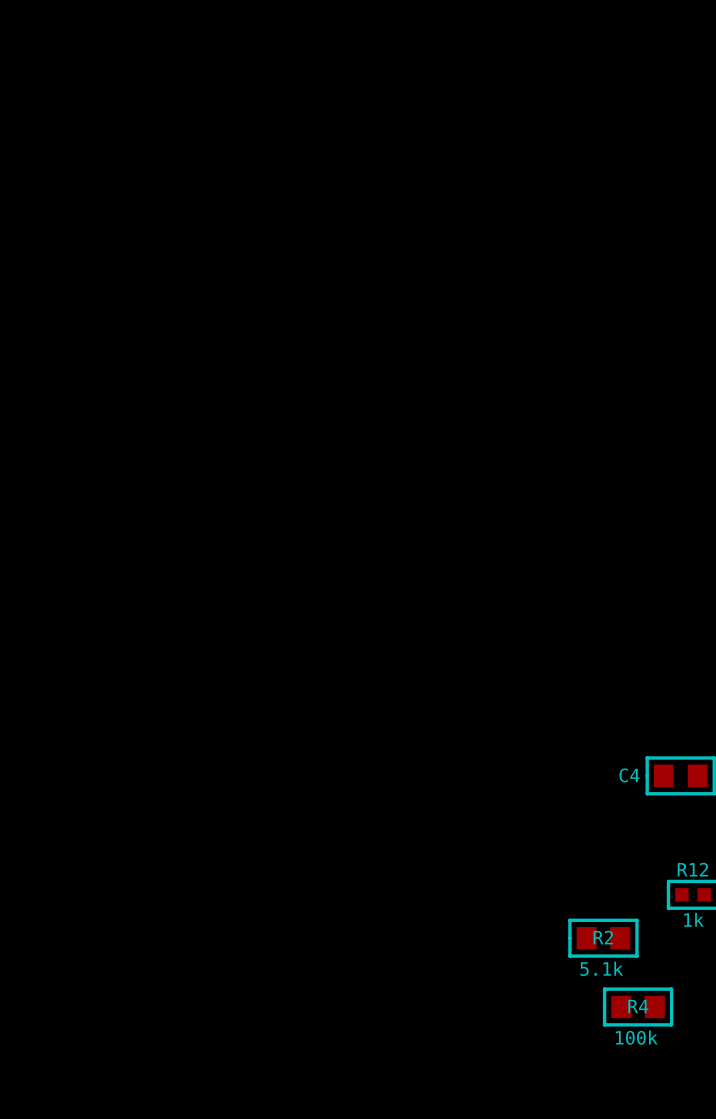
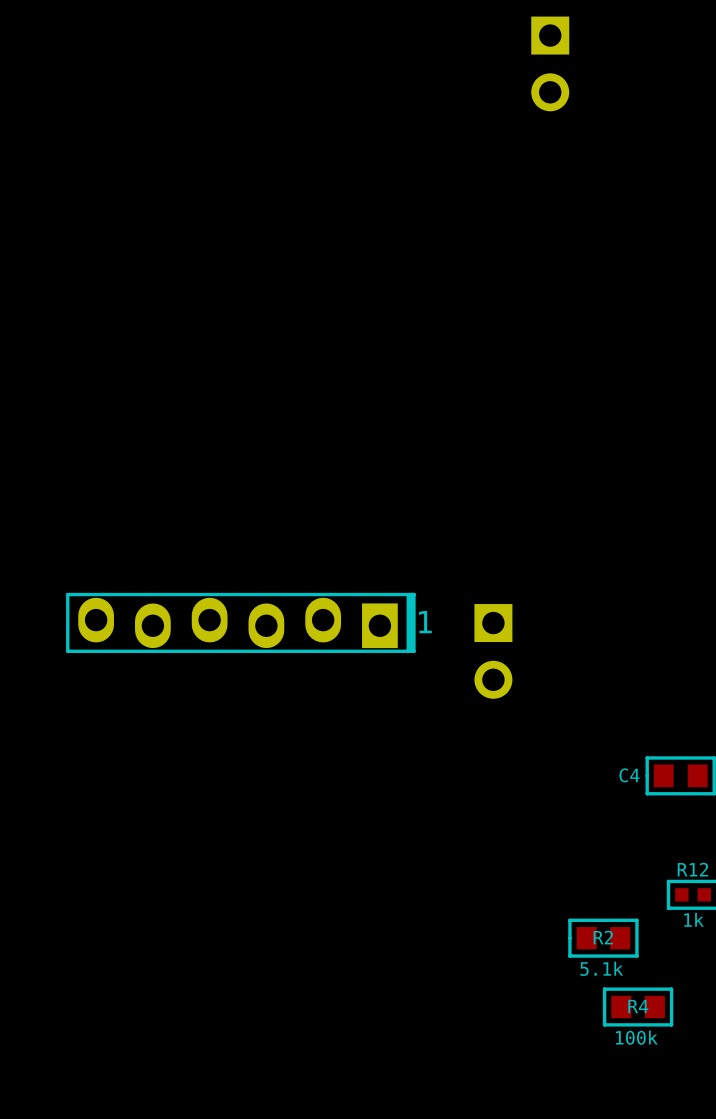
part: none -> (550, 63)
part: none -> (240, 622)
part: none -> (493, 651)

